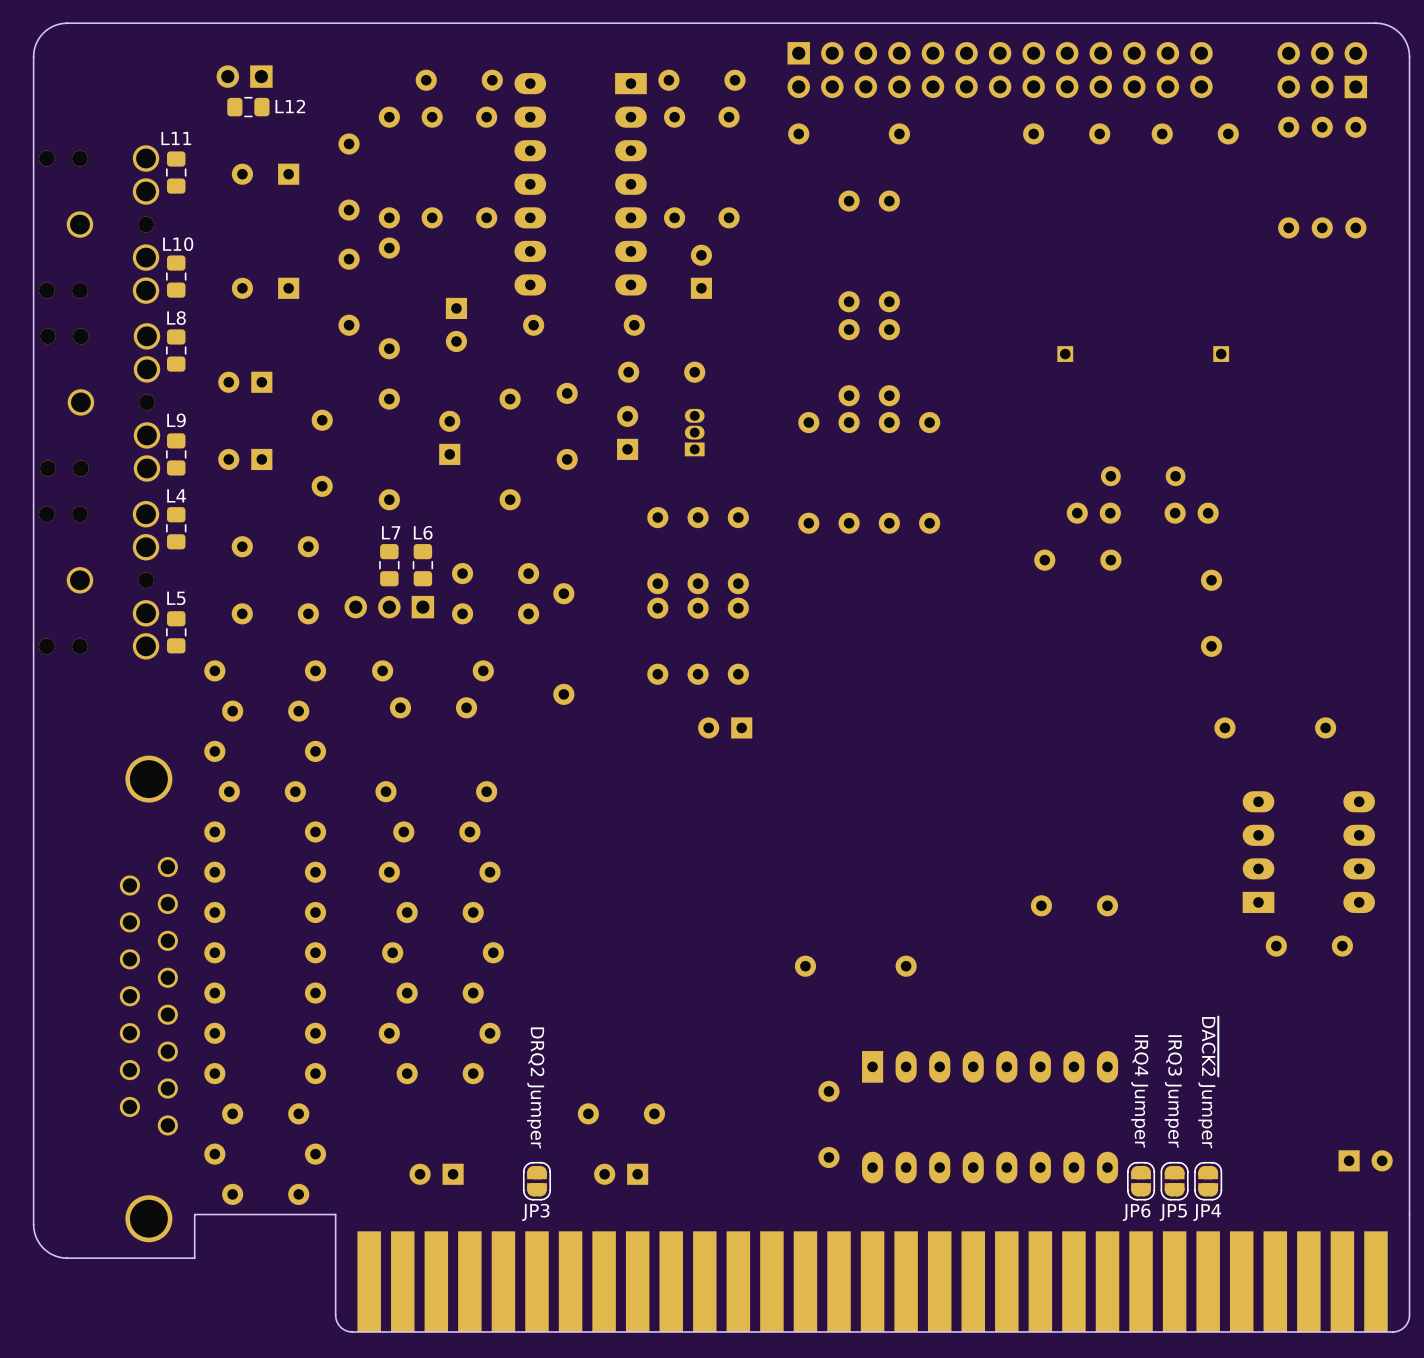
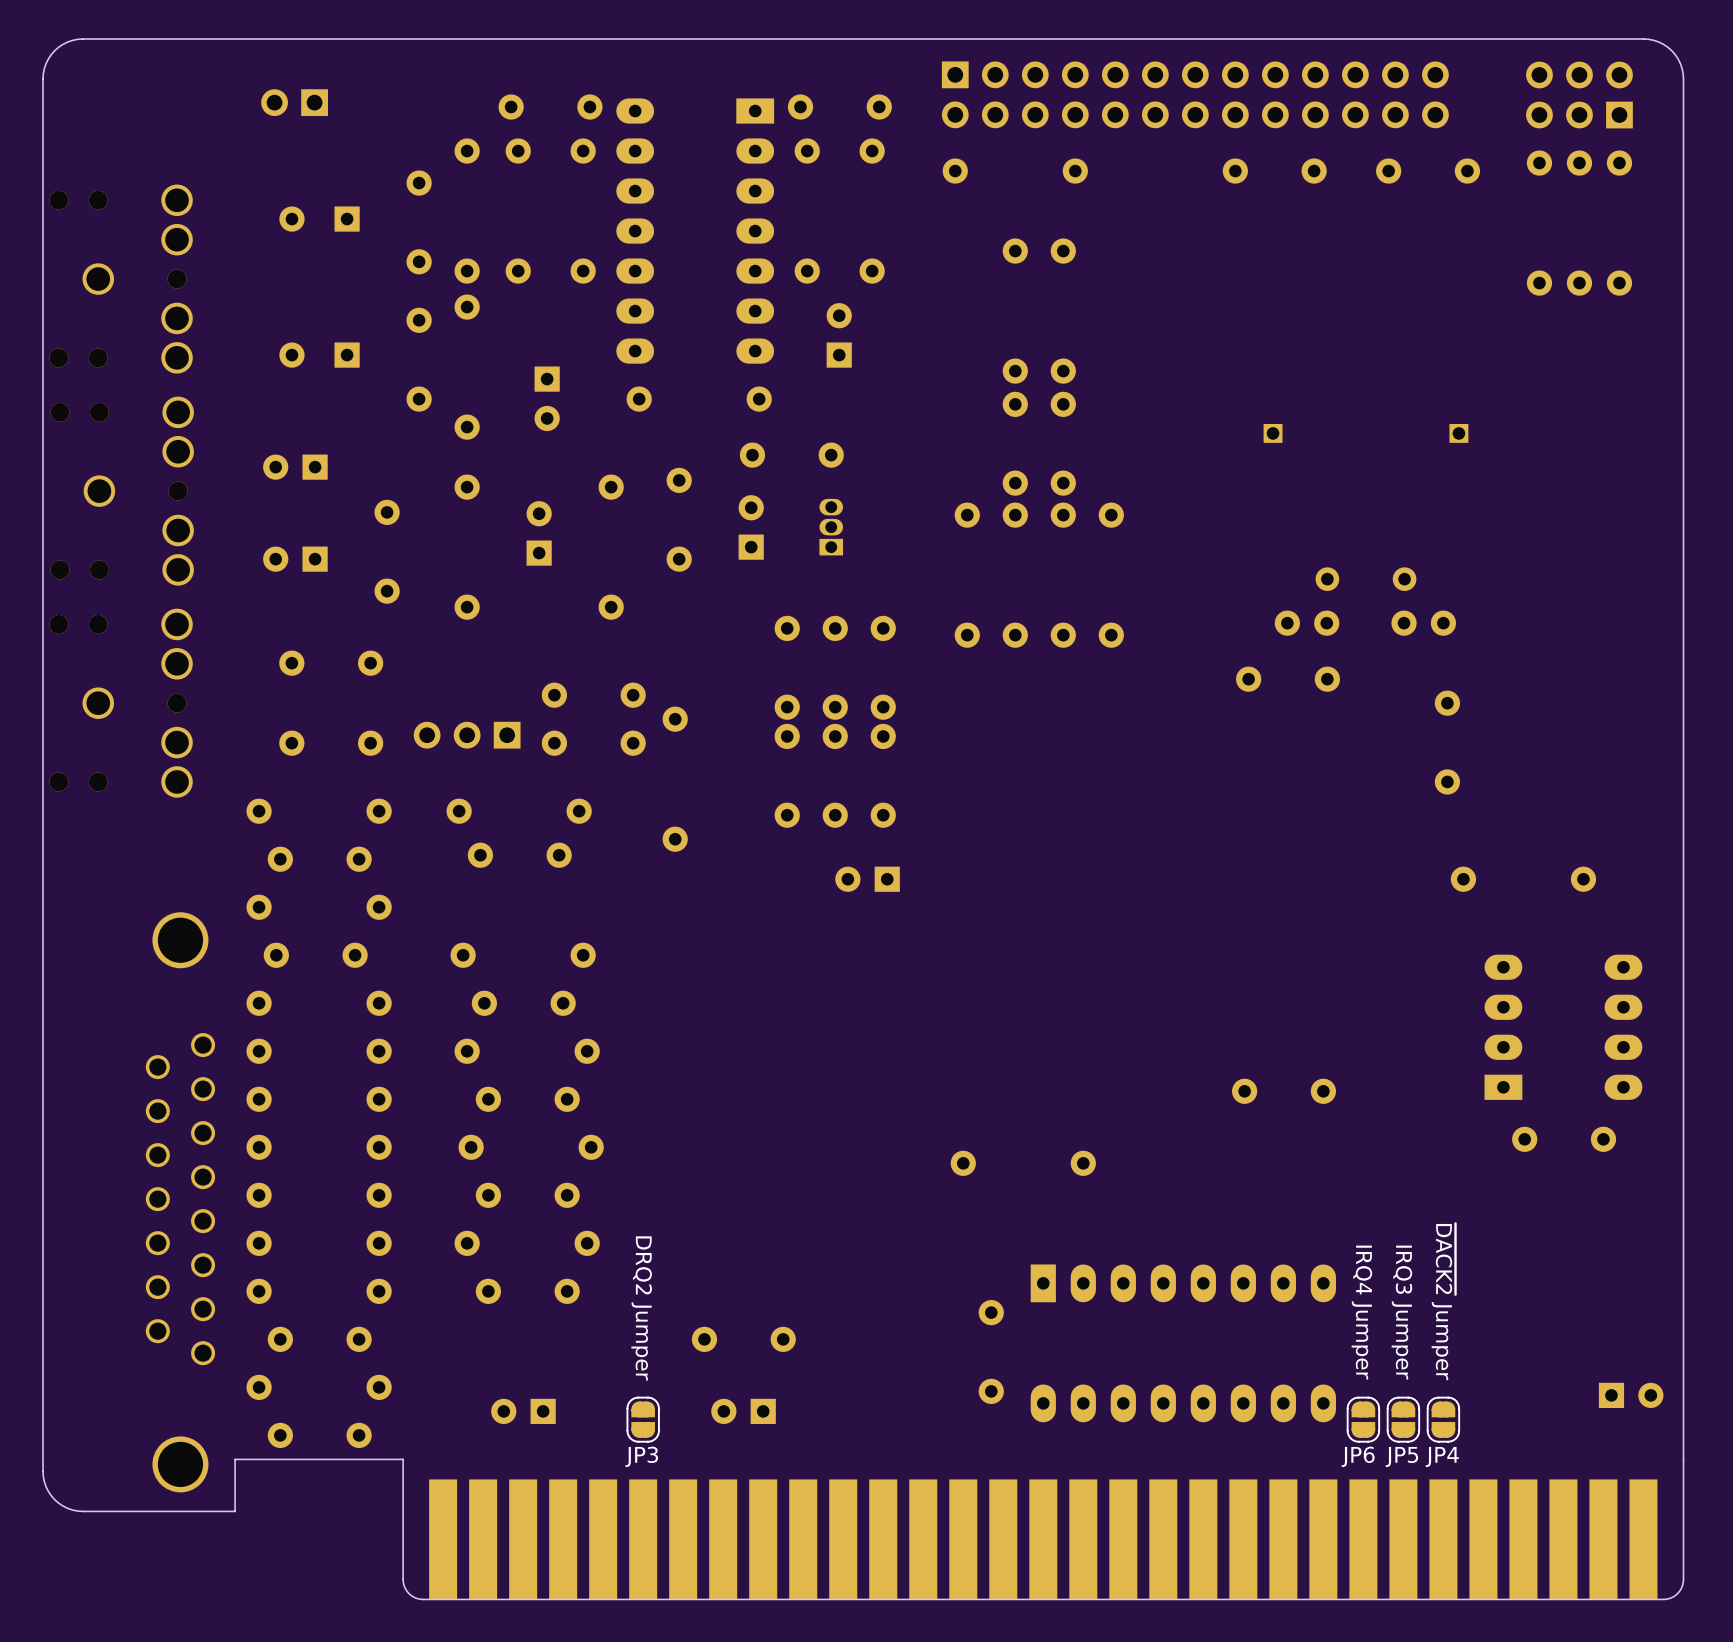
L12: (248, 107) -> none
L11: (176, 172) -> none
L10: (176, 276) -> none
L8: (176, 350) -> none
L9: (176, 454) -> none
L4: (176, 528) -> none
L7: (389, 565) -> none
L6: (422, 565) -> none
L5: (176, 632) -> none

